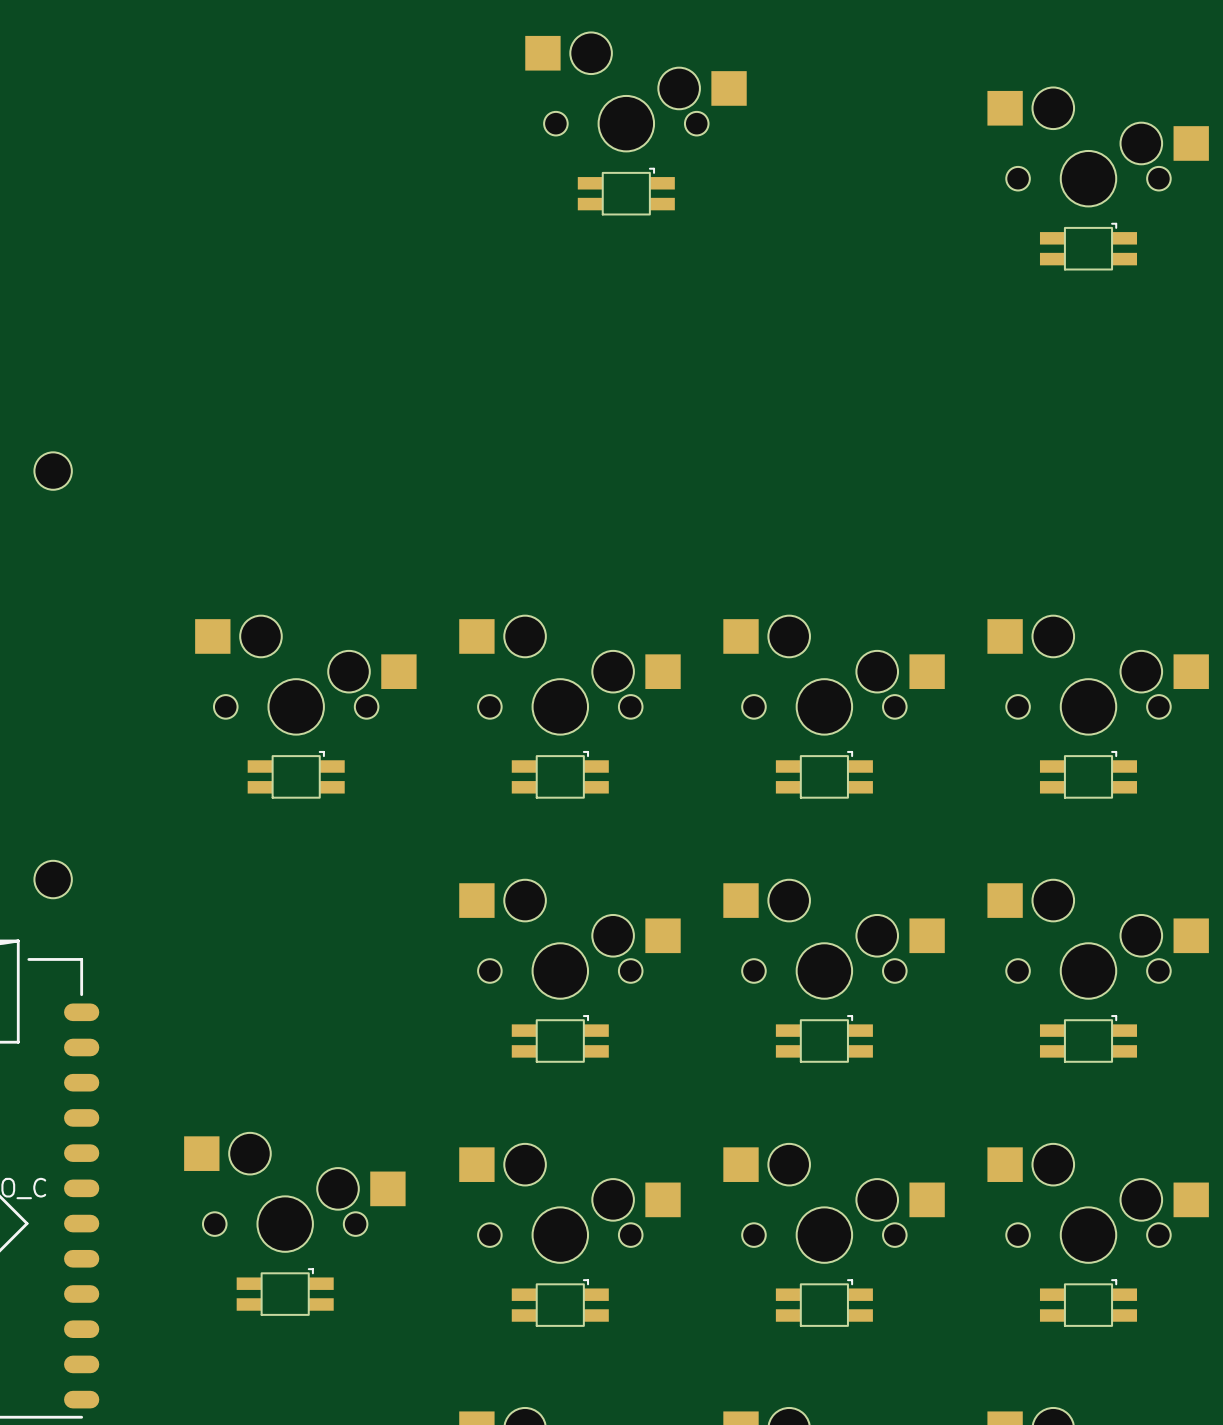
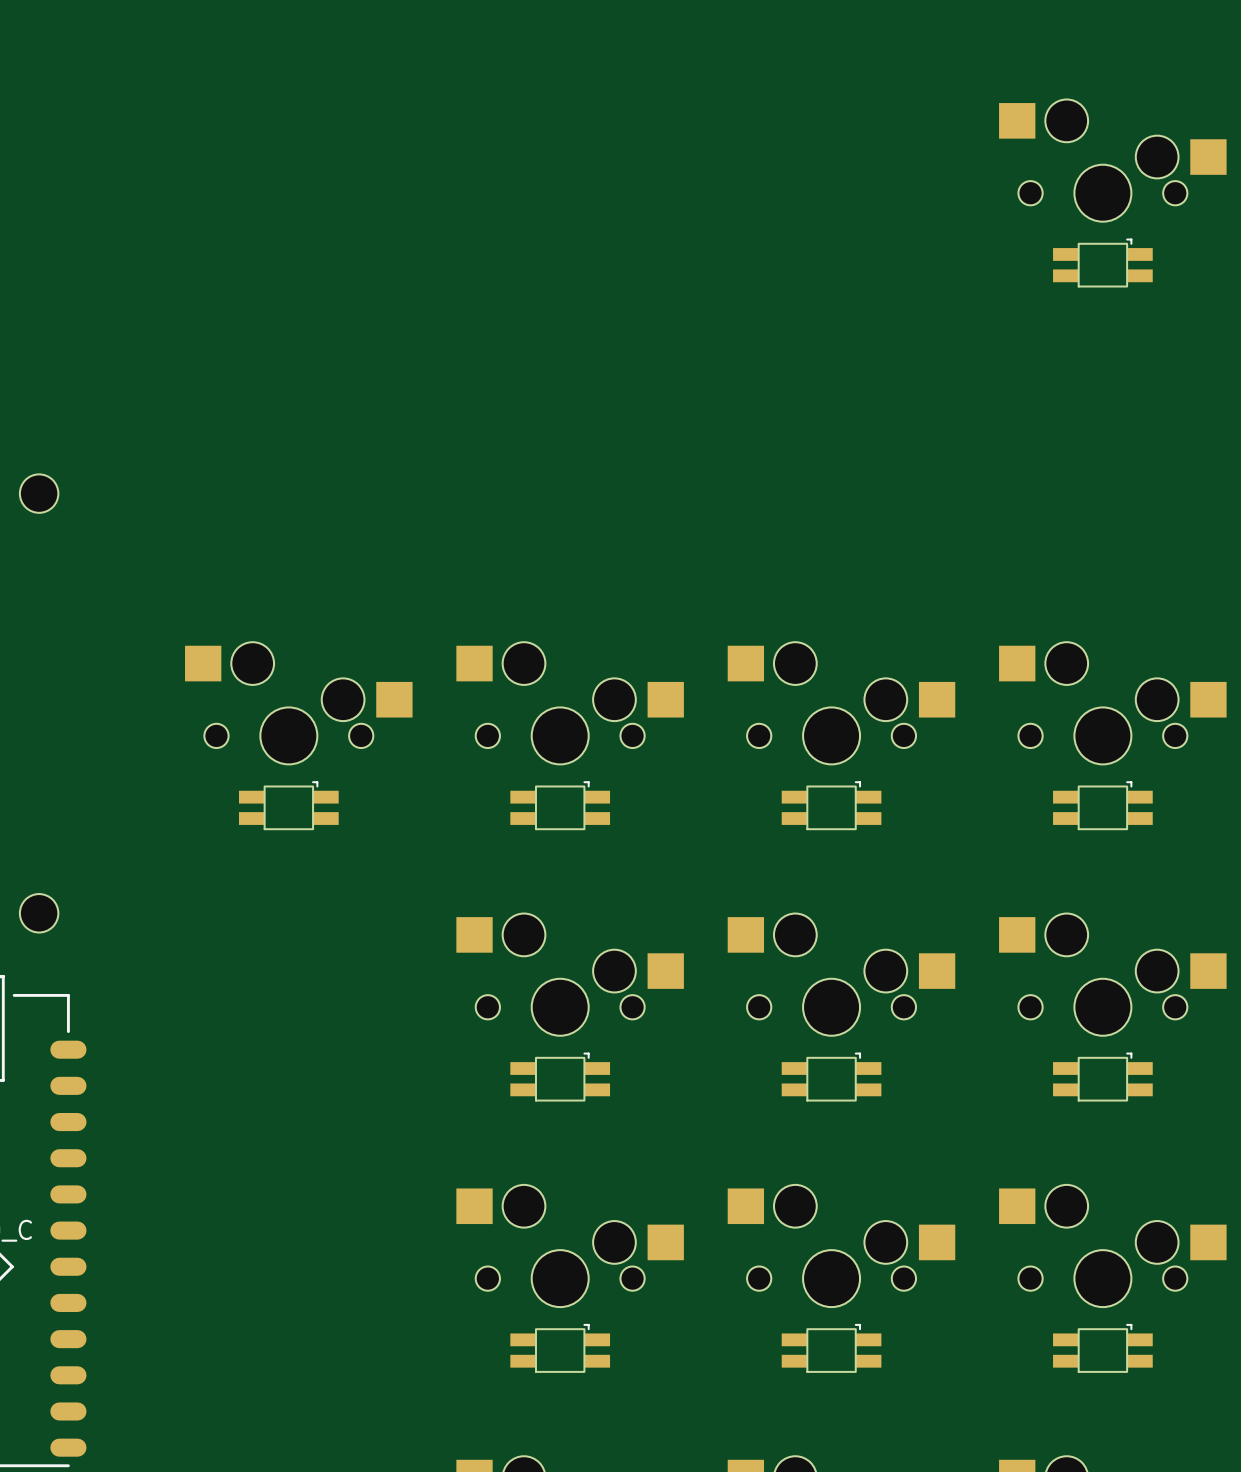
part: (635, 123) -> none
part: (294, 1223) -> none

